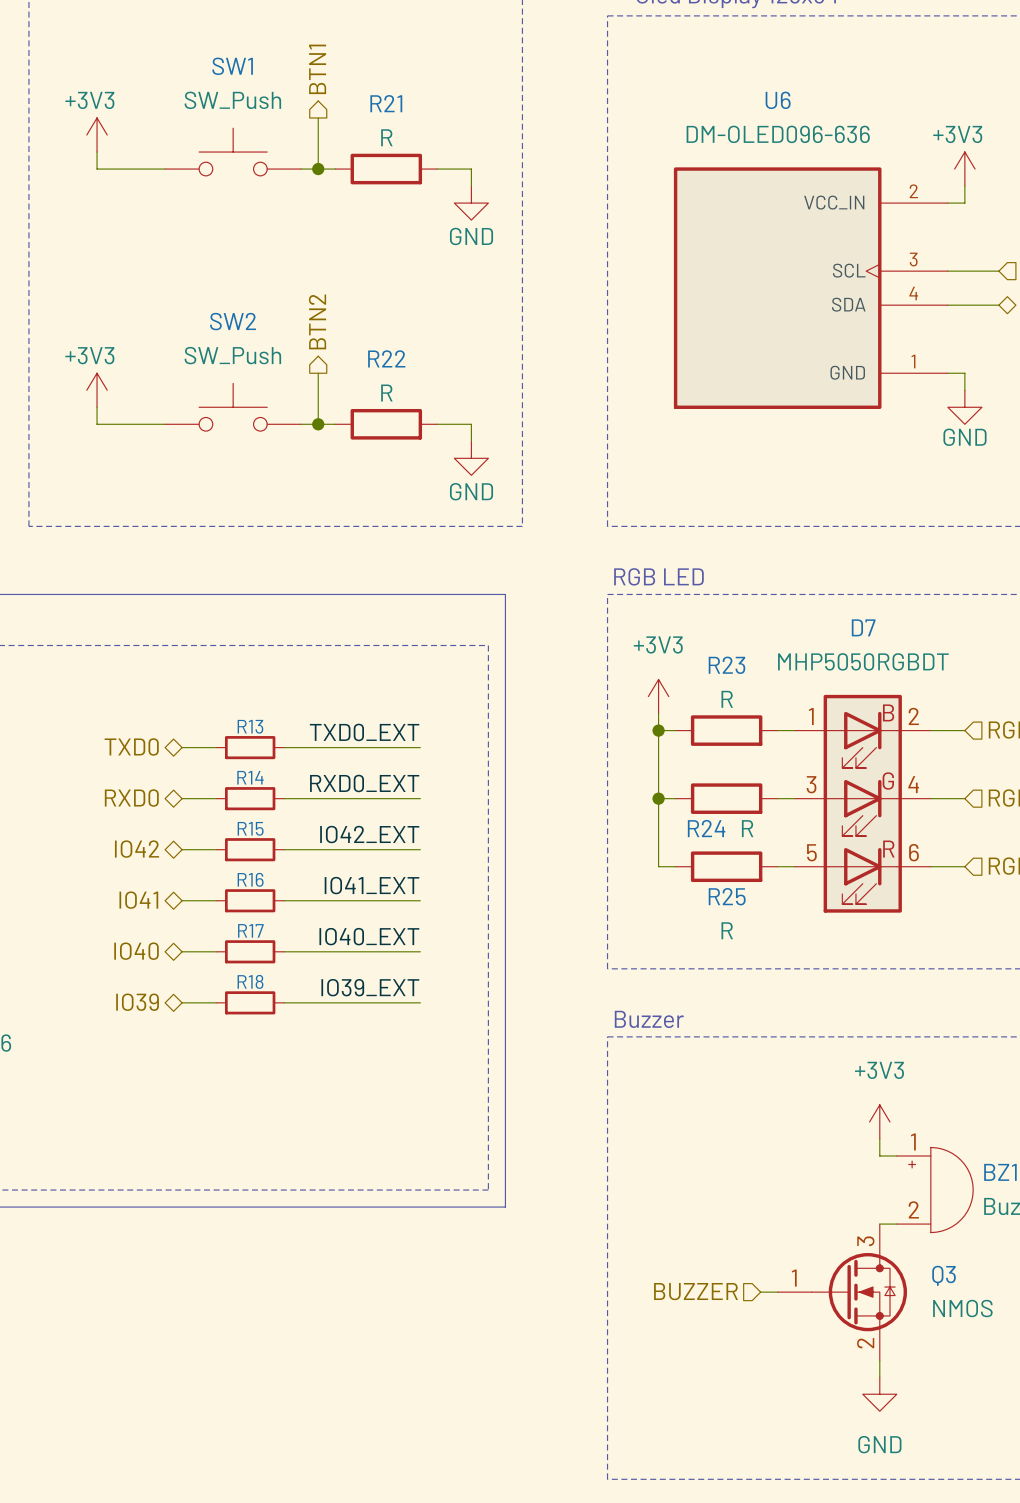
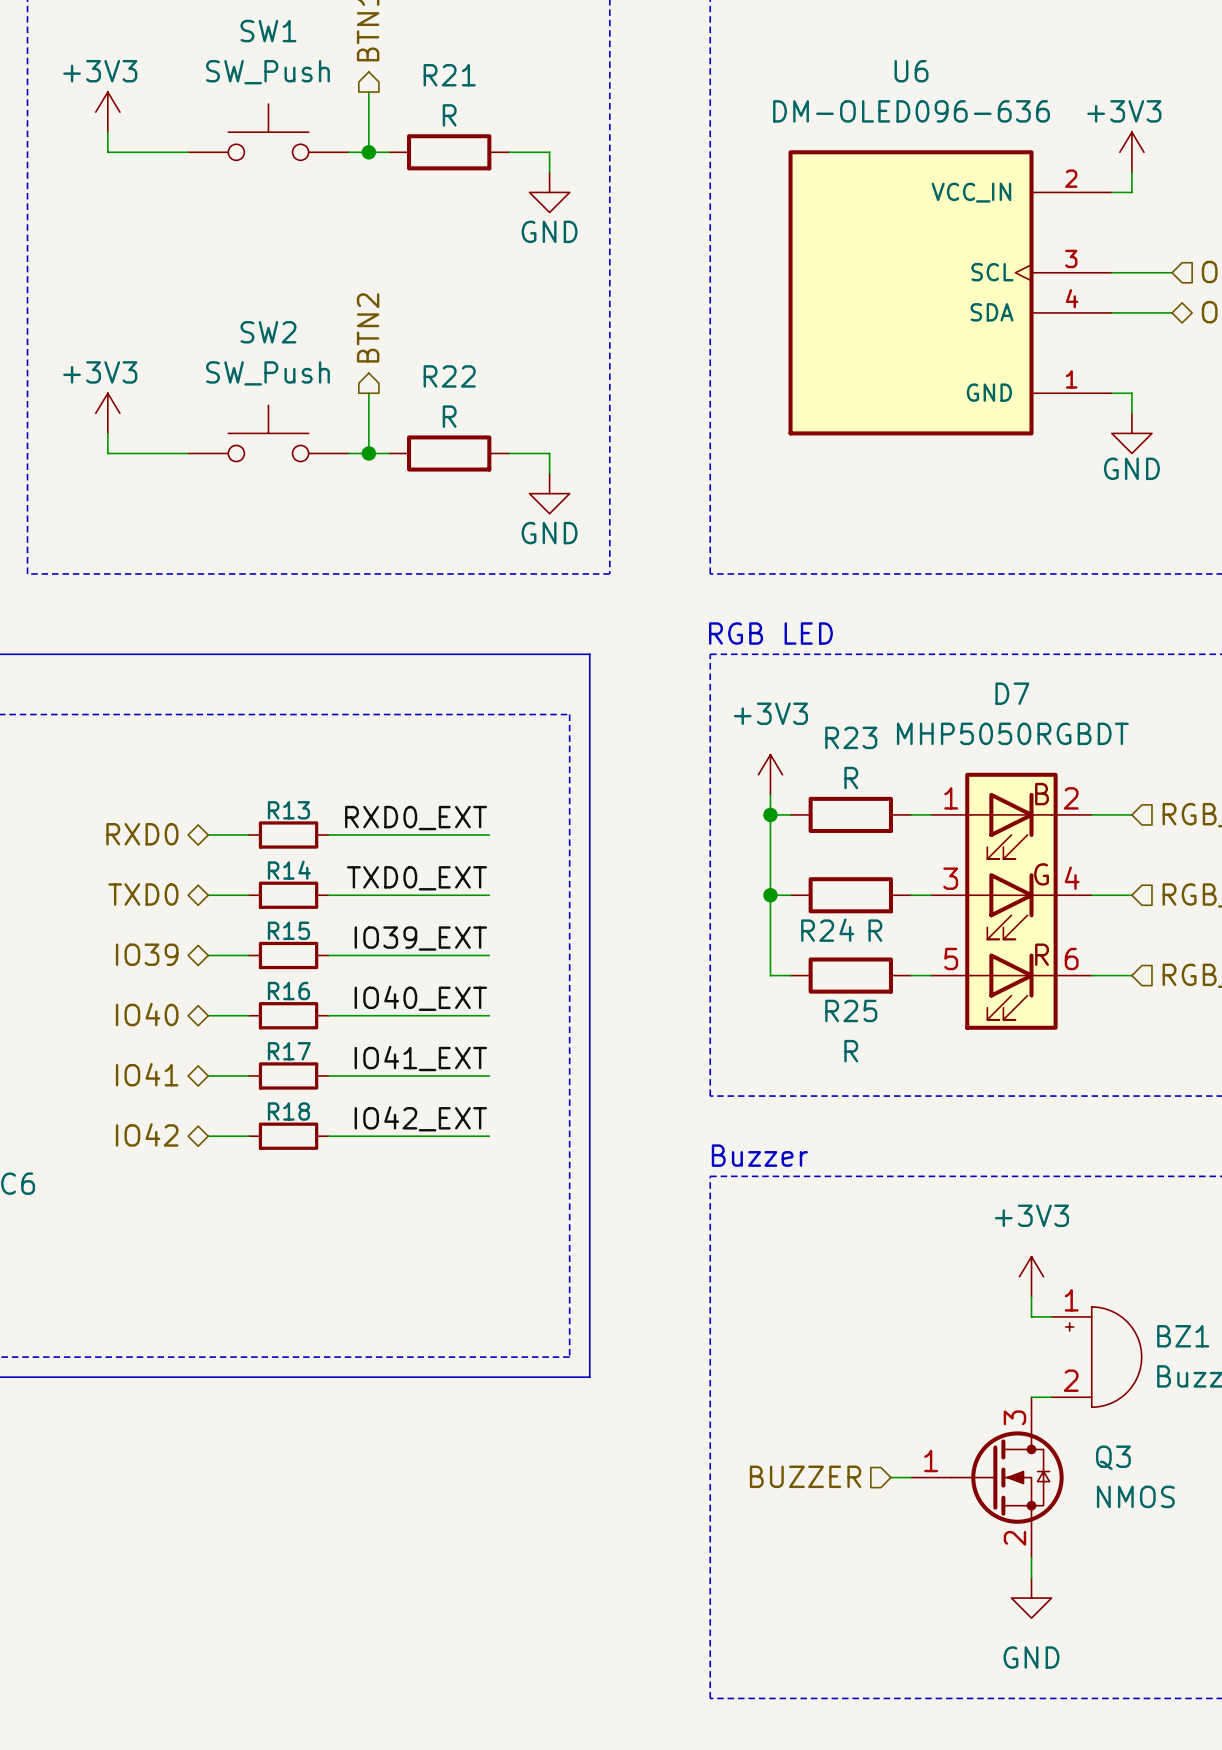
label: TXD0_EXT (364, 732) -> RXD0_EXT (416, 818)
hierarchical label: TXD0 (131, 746) -> RXD0 (142, 834)
label: RXD0_EXT (364, 783) -> TXD0_EXT (417, 878)
hierarchical label: RXD0 (131, 798) -> TXD0 (143, 894)
label: IO42_EXT (369, 834) -> IO39_EXT (420, 938)
hierarchical label: IO42 (137, 849) -> IO39 (147, 954)
label: IO41_EXT (371, 885) -> IO40_EXT (420, 998)
hierarchical label: IO41 (138, 900) -> IO40 (147, 1014)
label: IO40_EXT (369, 936) -> IO41_EXT (420, 1058)
hierarchical label: IO40 (136, 951) -> IO41 (147, 1074)
label: IO39_EXT (370, 987) -> IO42_EXT (420, 1118)
hierarchical label: IO39 (137, 1002) -> IO42 (147, 1134)

